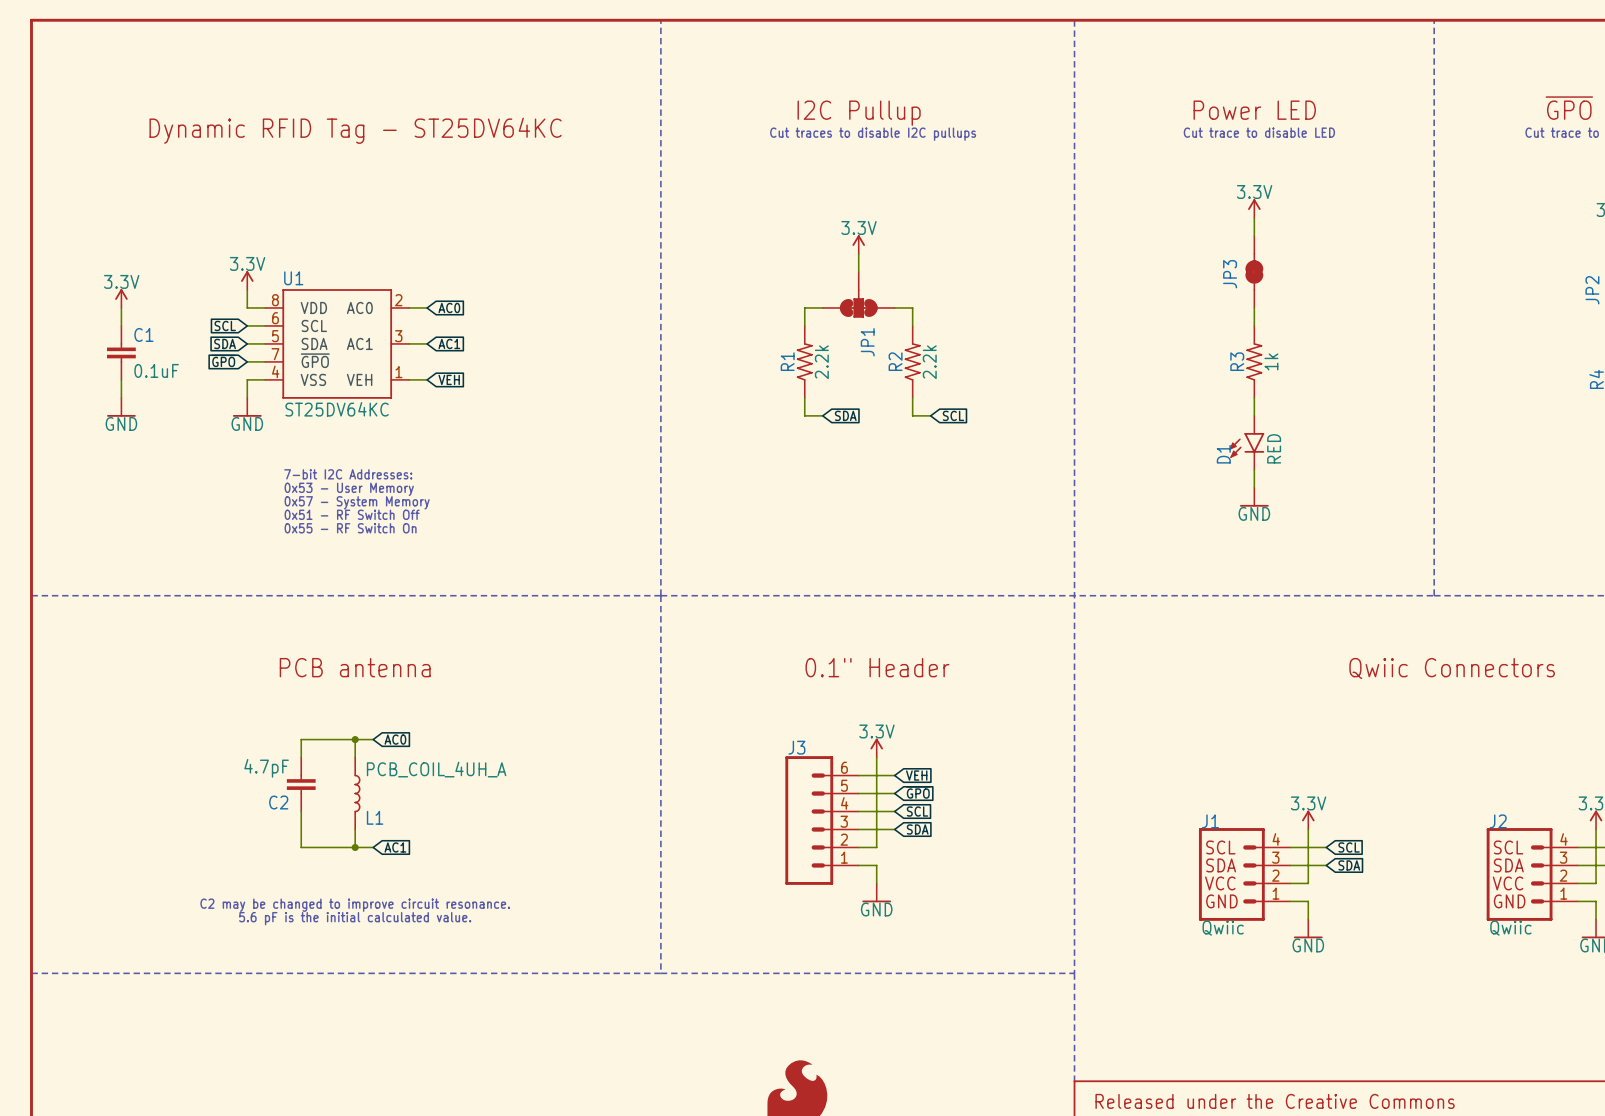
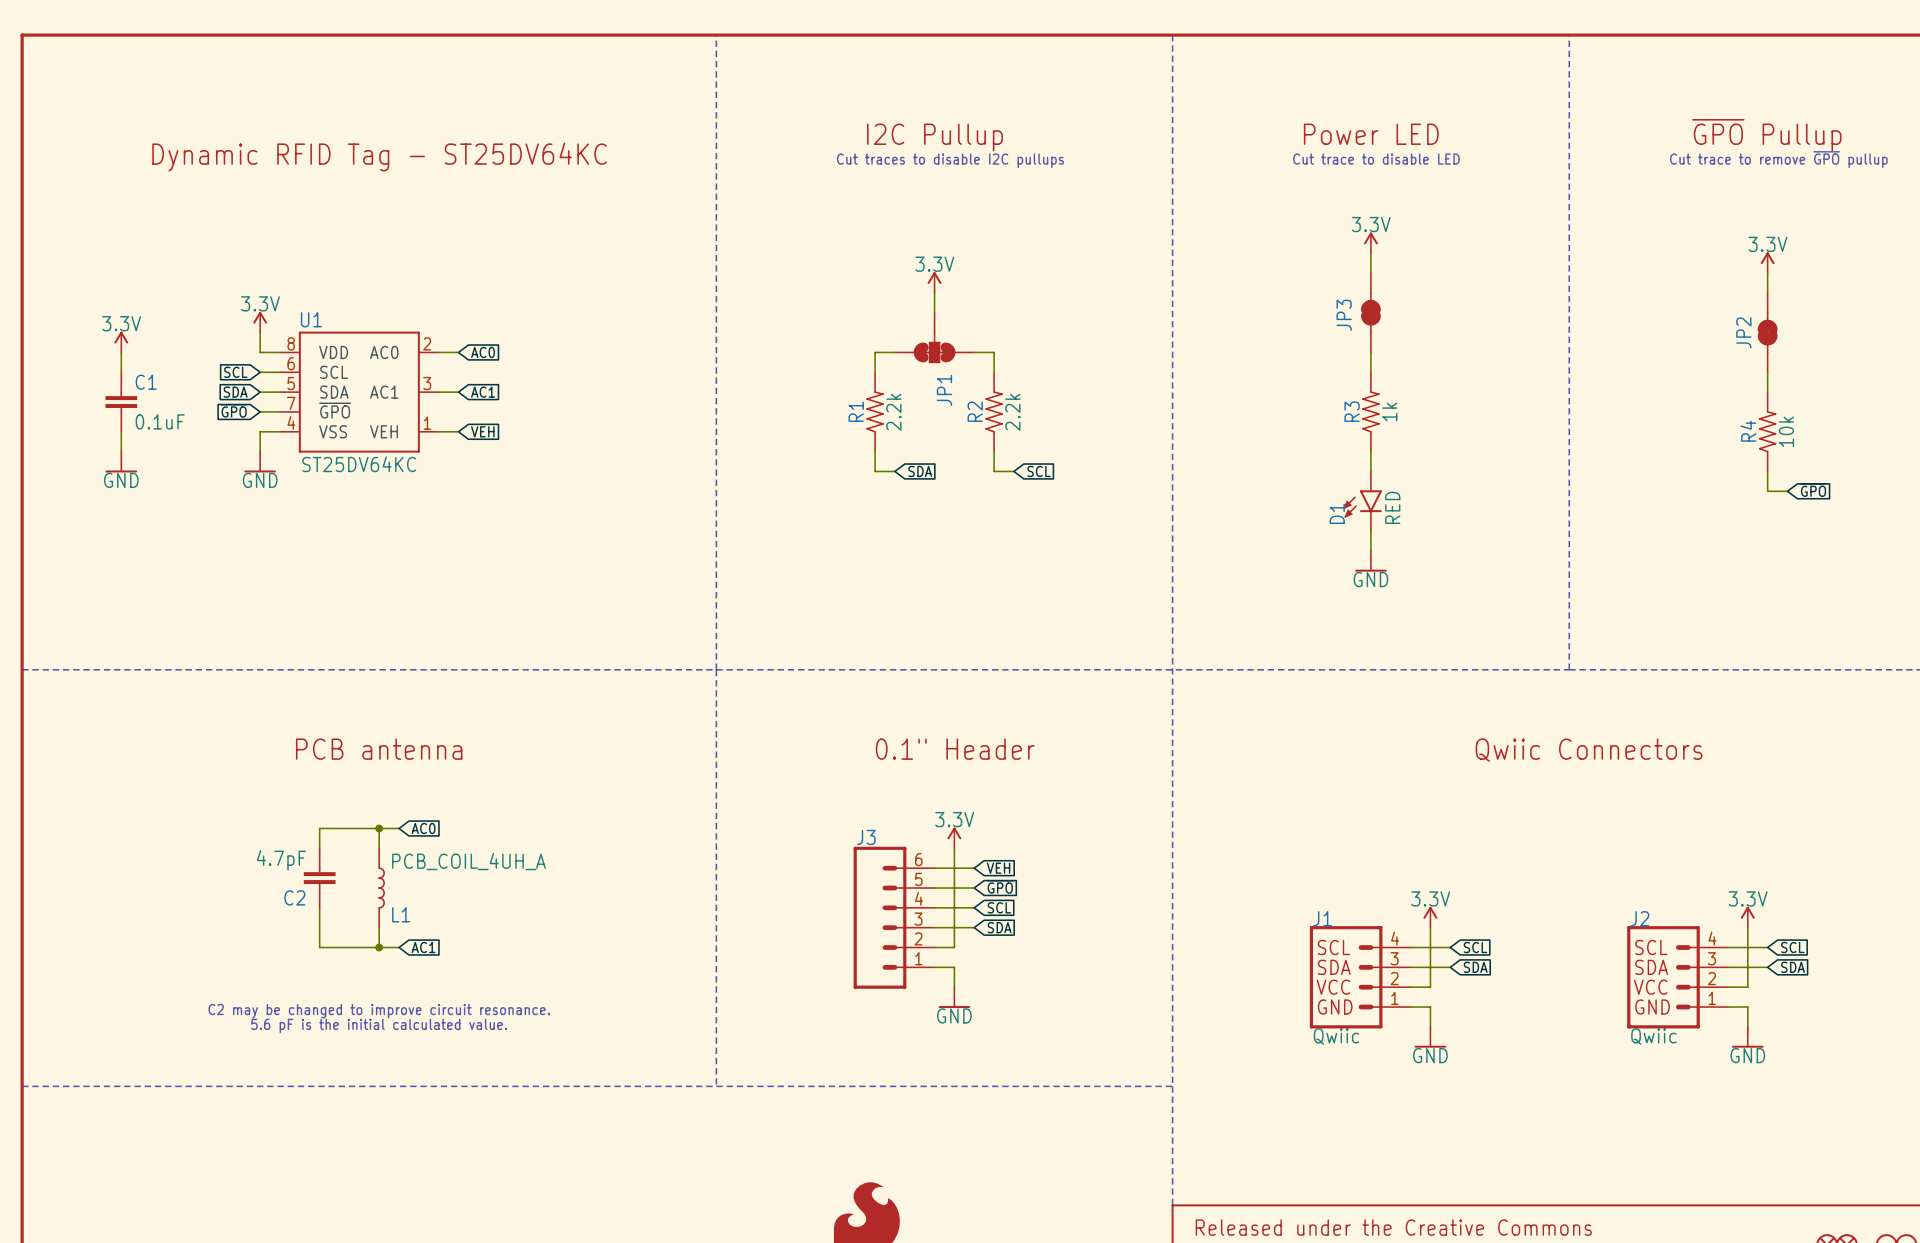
text: 7-bit I2C Addresses: (348, 474) -> none
text: 0x53 - User Memory (349, 489) -> none
text: 0x57 - System Memory (357, 502) -> none
text: 0x51 - RF Switch Off (352, 514) -> none
text: 0x55 - RF Switch On (350, 528) -> none

